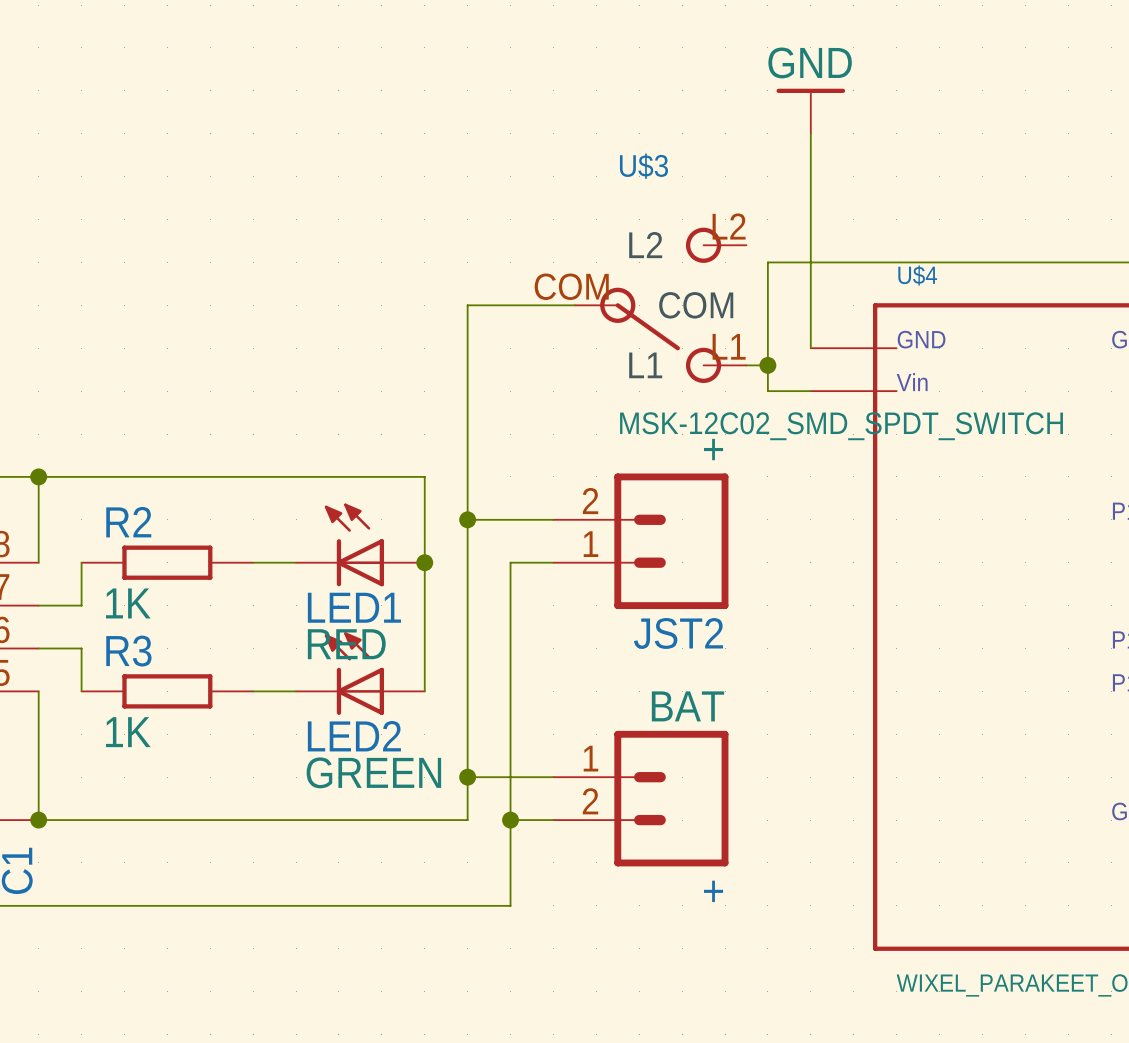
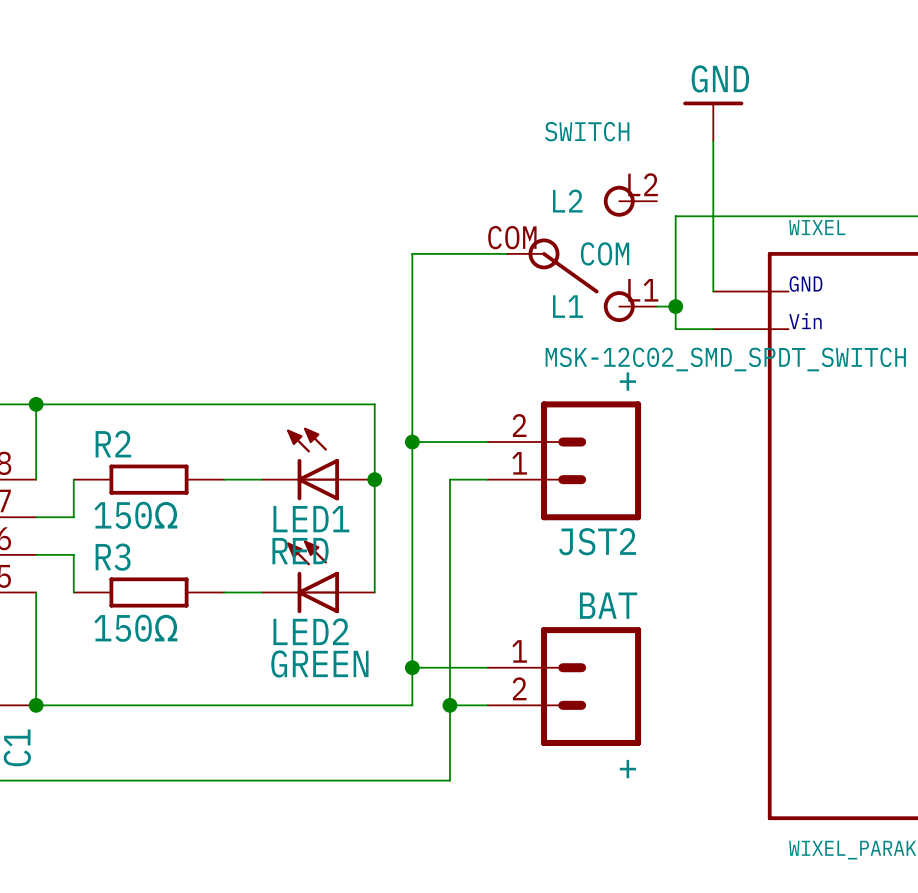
power symbol position: GND (810, 111) -> GND (713, 121)
U$3 name: U$3 (643, 166) -> SWITCH (587, 131)
U$4 name: U$4 (917, 275) -> WIXEL (817, 227)
R2 value: 1K (128, 603) -> 150Ω (135, 515)
R3 value: 1K (128, 732) -> 150Ω (135, 628)

